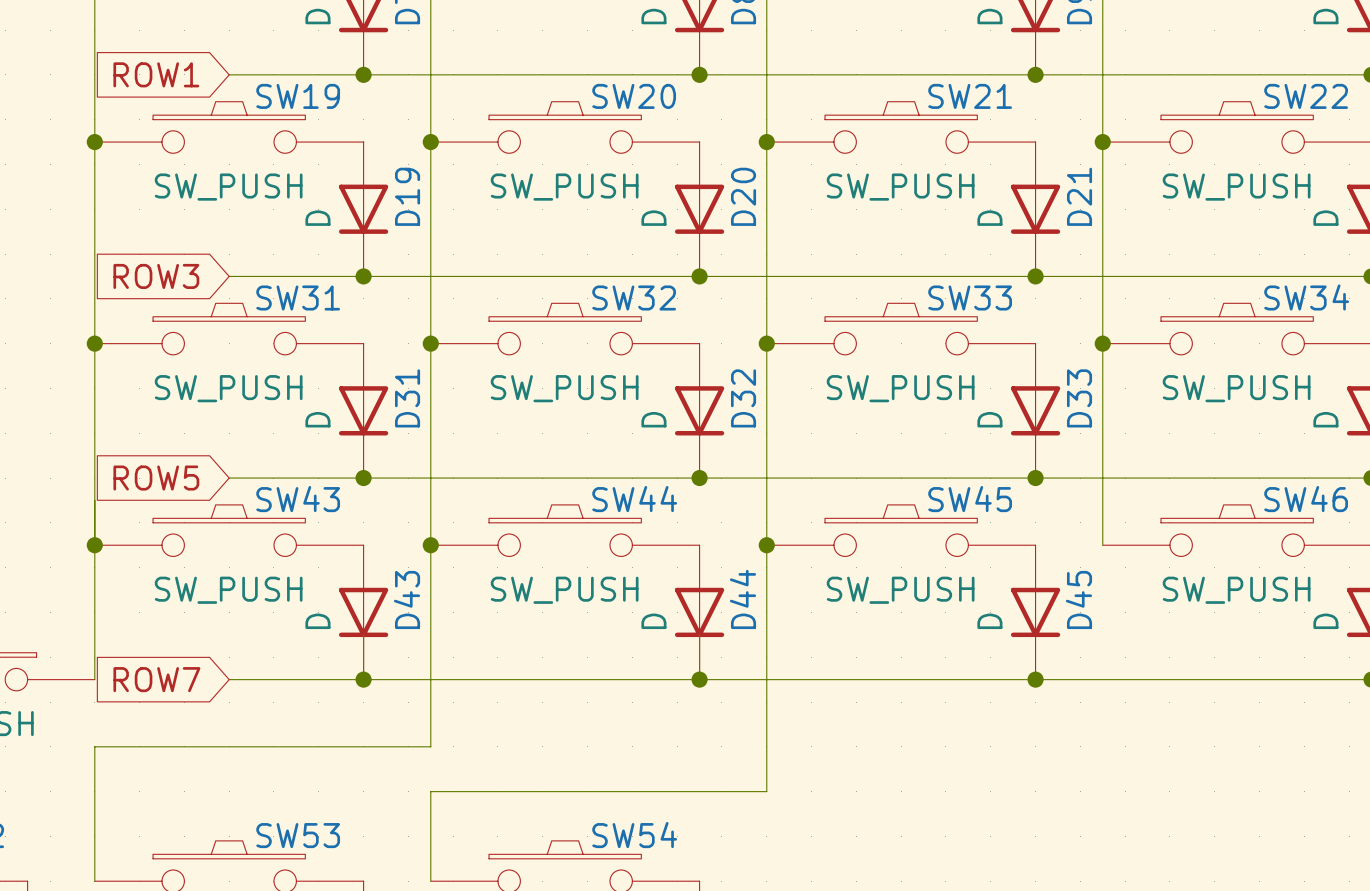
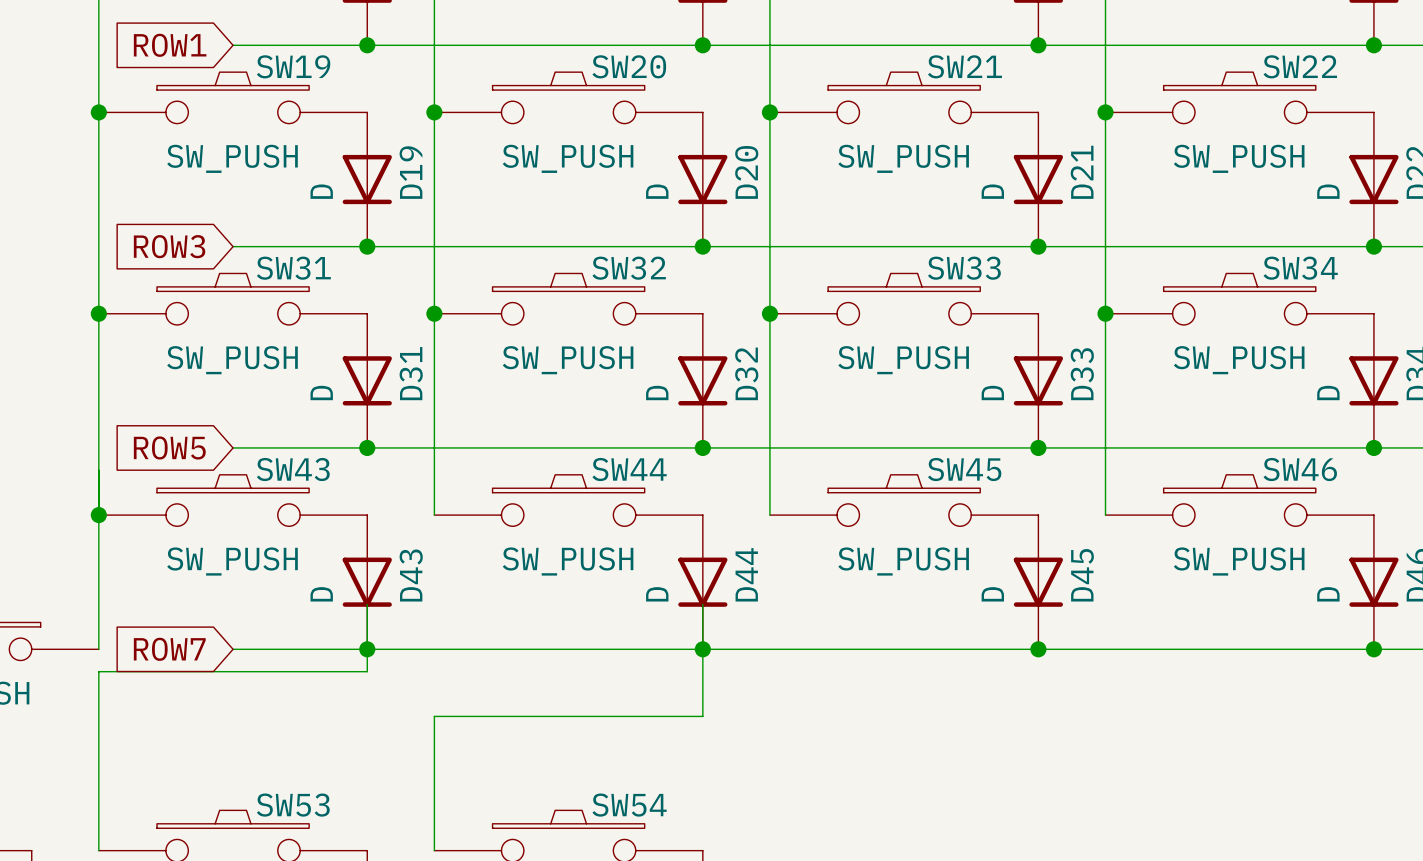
wire: (430, 545) (430, 746) (94, 746) -> (367, 649) (367, 671) (98, 671) (98, 716)
junction: (430, 545) -> none
wire: (766, 545) (766, 791) (430, 791) -> (702, 649) (702, 716) (434, 716) (434, 761)
junction: (766, 545) -> none

